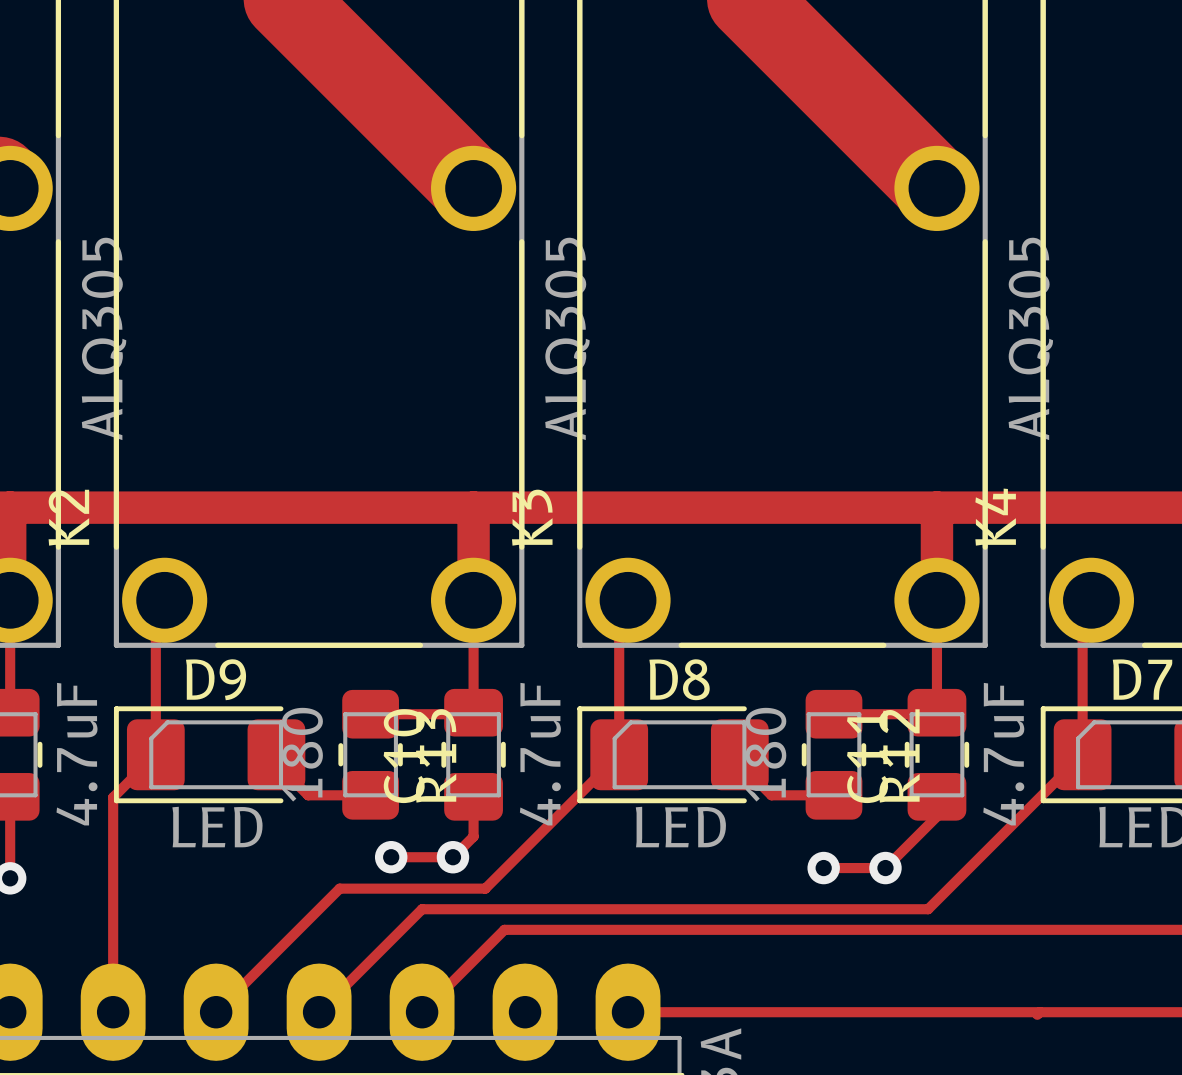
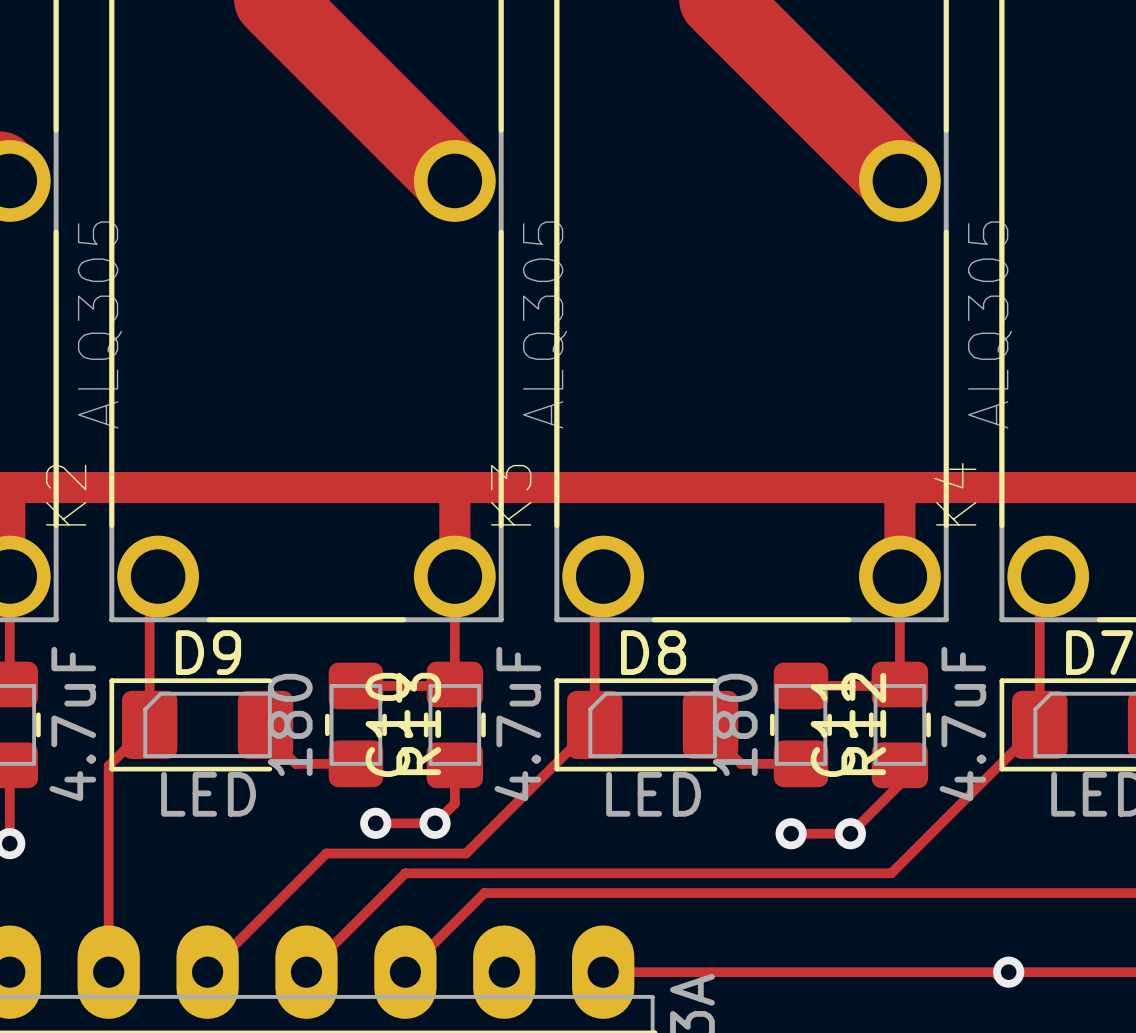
via: none -> (1008, 972)

